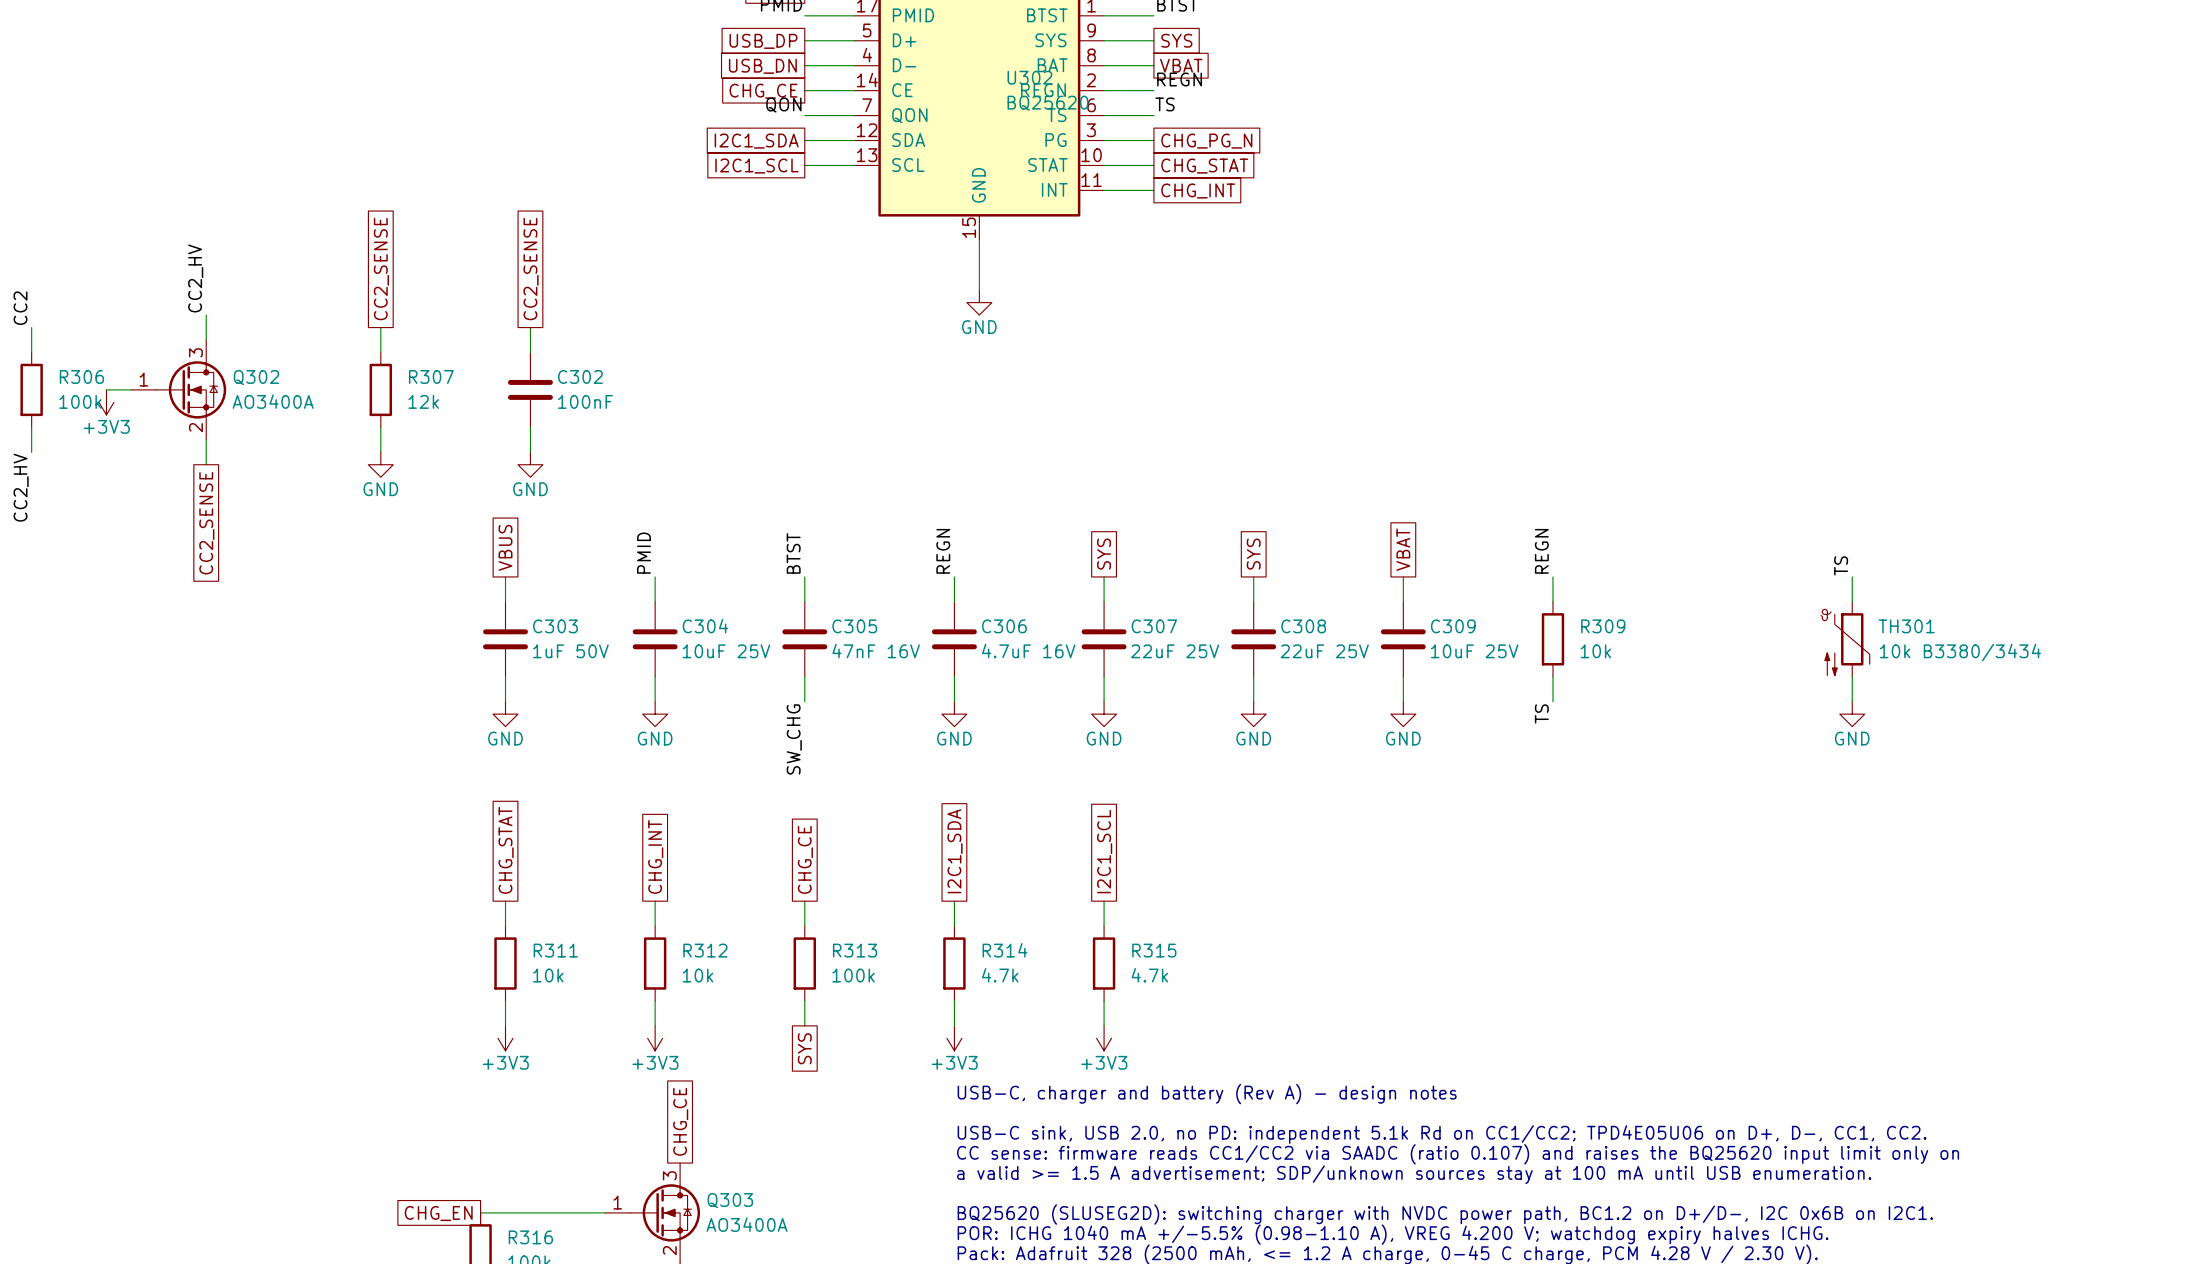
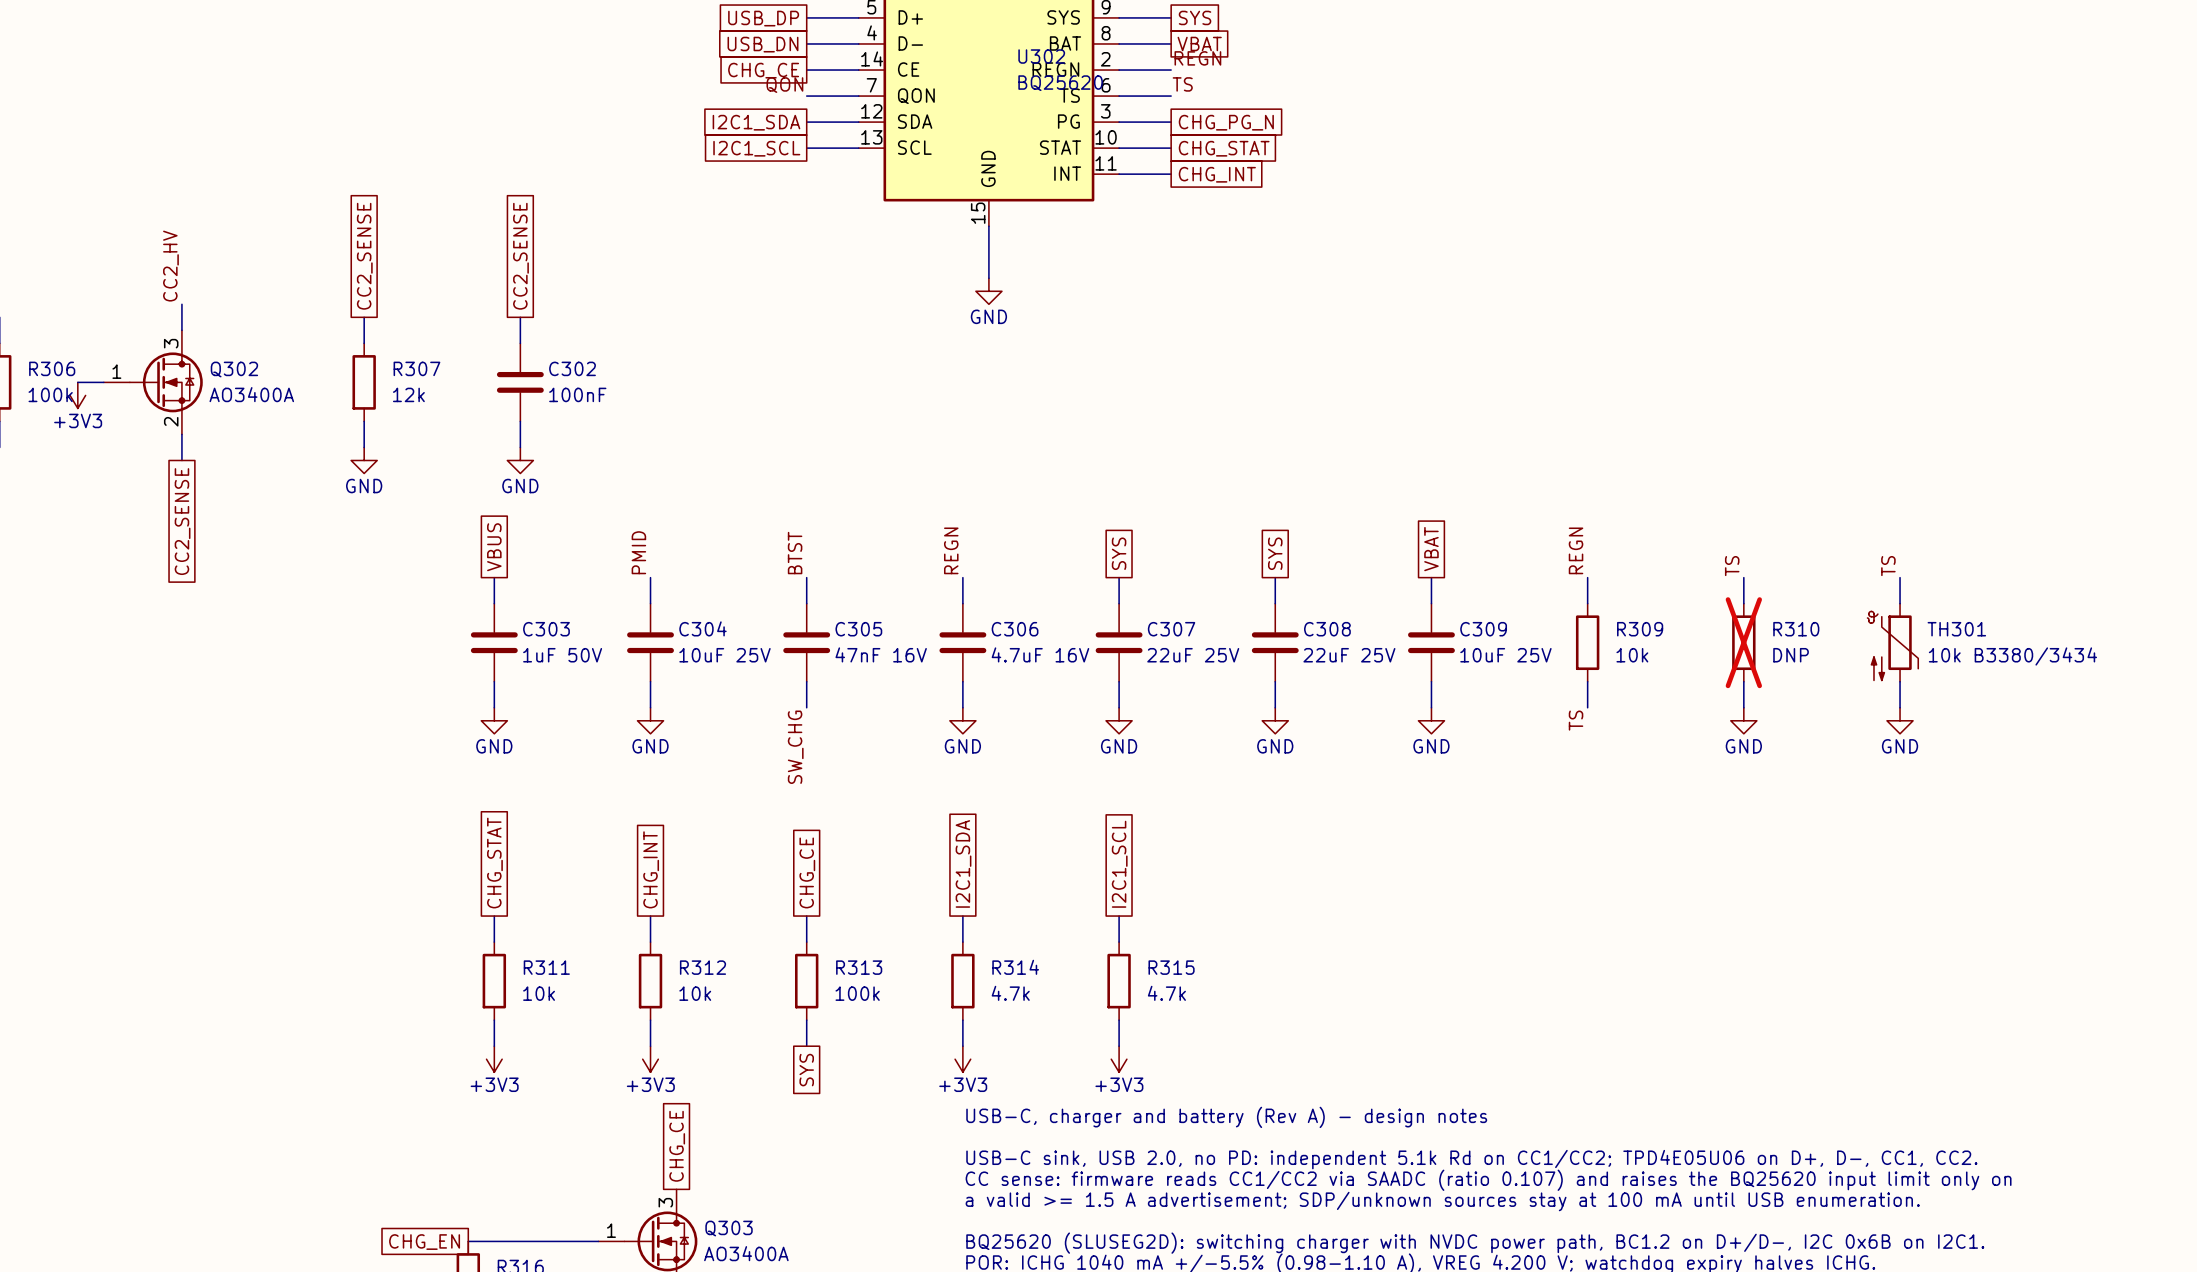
label: none -> TS (1732, 566)
wire: none -> (1743, 577) (1743, 603)
R310: none -> DNP (1743, 642)
wire: none -> (1743, 681) (1743, 707)
power symbol: none -> GND (1743, 720)

